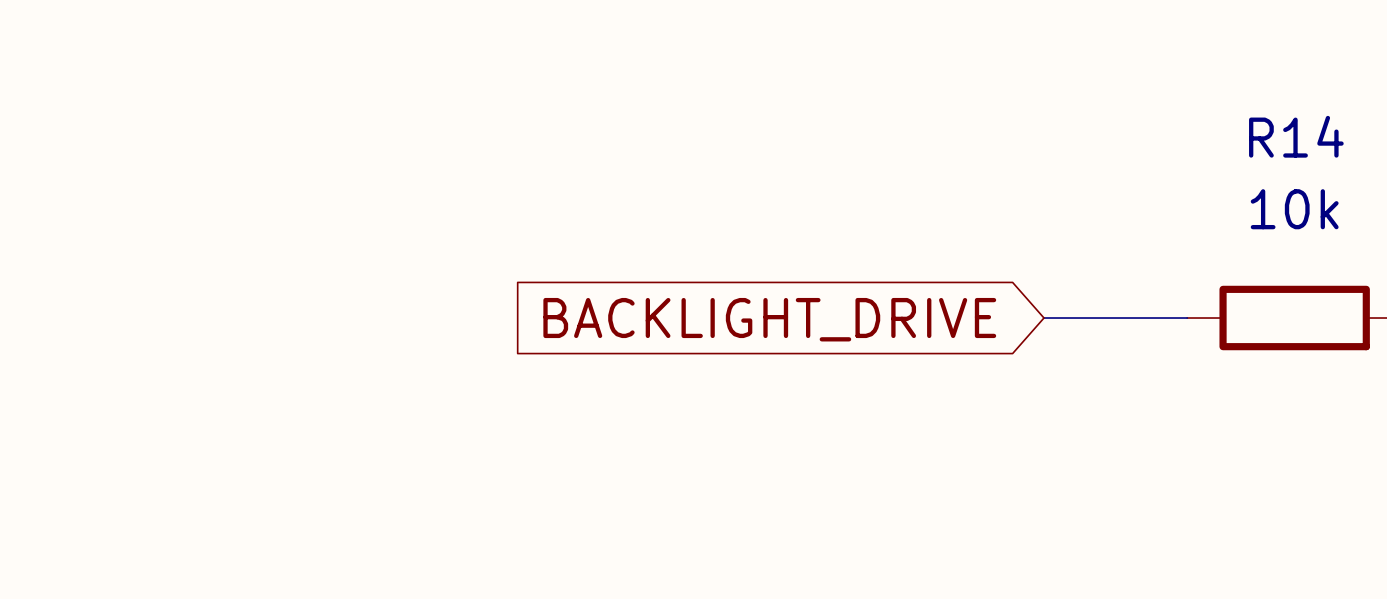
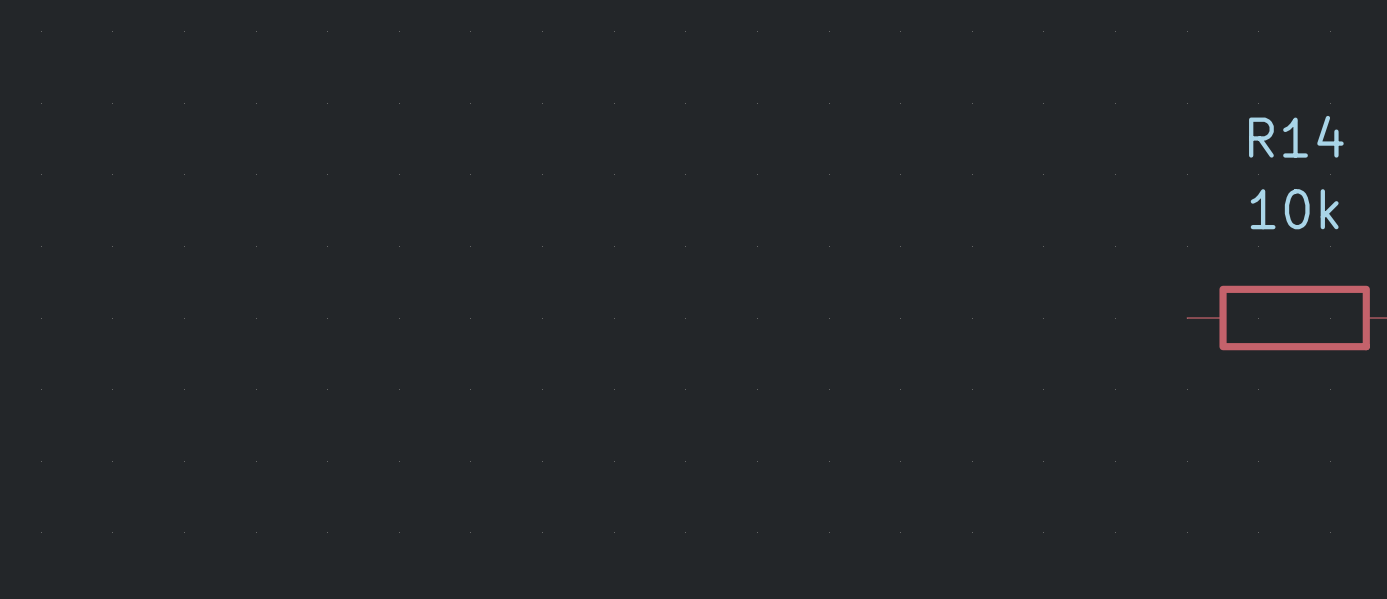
wire: (1043, 318) (1187, 318) -> none
global label: BACKLIGHT_DRIVE (769, 319) -> none

